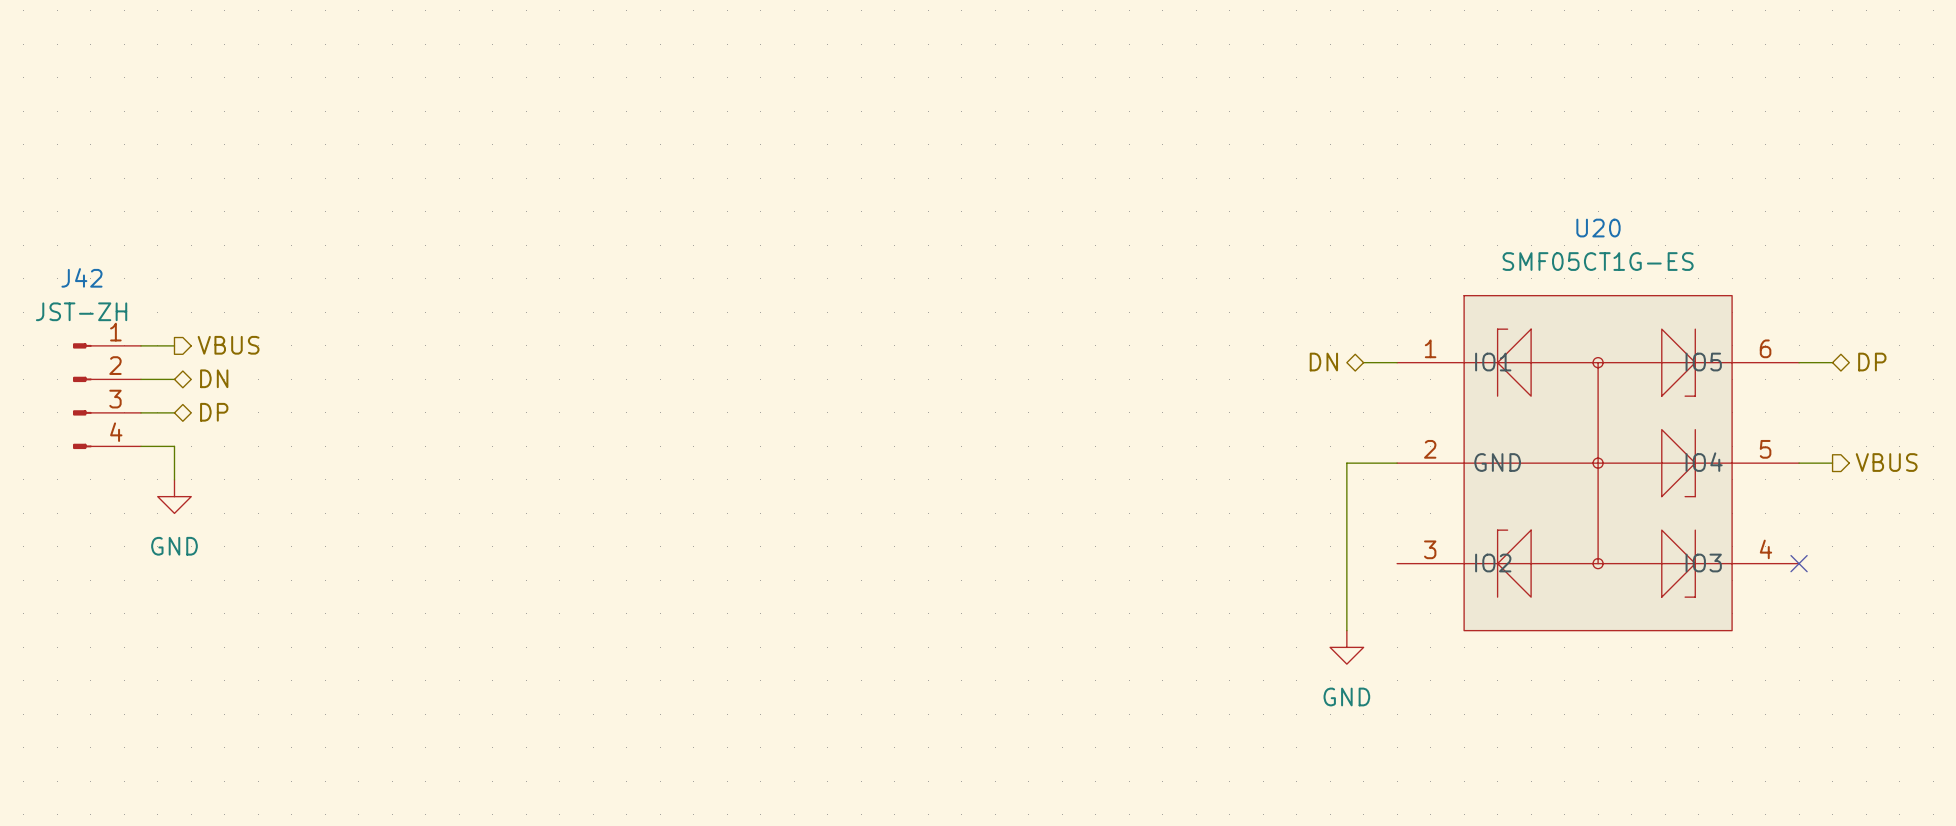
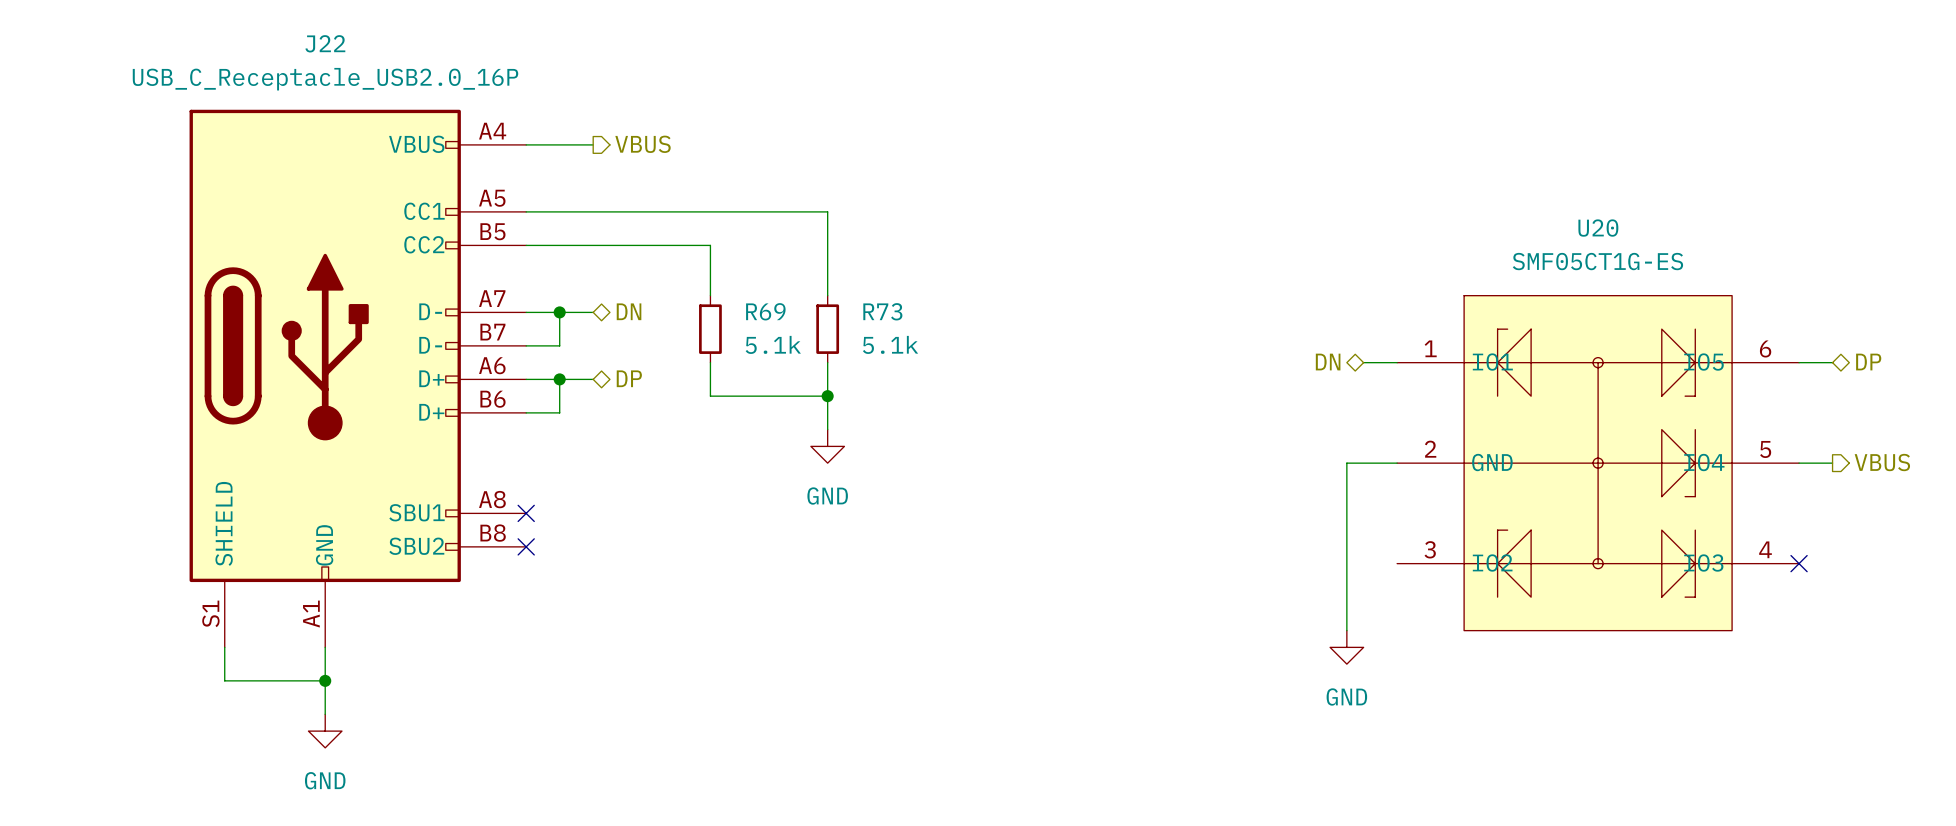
wire: none -> (526, 144) (593, 144)
hierarchical label: none -> VBUS (642, 144)
wire: none -> (526, 211) (827, 211) (827, 295)
wire: none -> (526, 245) (710, 245) (710, 295)
hierarchical label: none -> DN (629, 311)
wire: none -> (526, 312) (593, 312)
wire: none -> (559, 312) (559, 345) (526, 345)
junction: none -> (559, 312)
R69: none -> 5.1k (710, 329)
R73: none -> 5.1k (827, 329)
wire: (140, 345) (174, 345) -> none
hierarchical label: VBUS (228, 345) -> none
wire: none -> (710, 362) (710, 396) (827, 396)
wire: none -> (827, 362) (827, 429)
hierarchical label: DN (214, 378) -> none
J22: none -> USB_C_Receptacle_USB2.0_16P (357, 378)
hierarchical label: none -> DP (629, 378)
wire: (140, 379) (174, 379) -> none
wire: none -> (526, 379) (593, 379)
wire: none -> (559, 379) (559, 412) (526, 412)
junction: none -> (559, 379)
J42: JST-ZH (106, 396) -> none
junction: none -> (827, 396)
wire: (140, 412) (174, 412) -> none
hierarchical label: DP (214, 412) -> none
wire: (140, 446) (174, 446) (174, 479) -> none
power symbol: none -> GND (827, 446)
power symbol position: GND (174, 496) -> GND (325, 731)
no-connect mark: none -> (526, 513)
no-connect mark: none -> (526, 546)
wire: none -> (224, 647) (224, 680) (325, 680)
wire: none -> (325, 647) (325, 714)
junction: none -> (325, 680)

